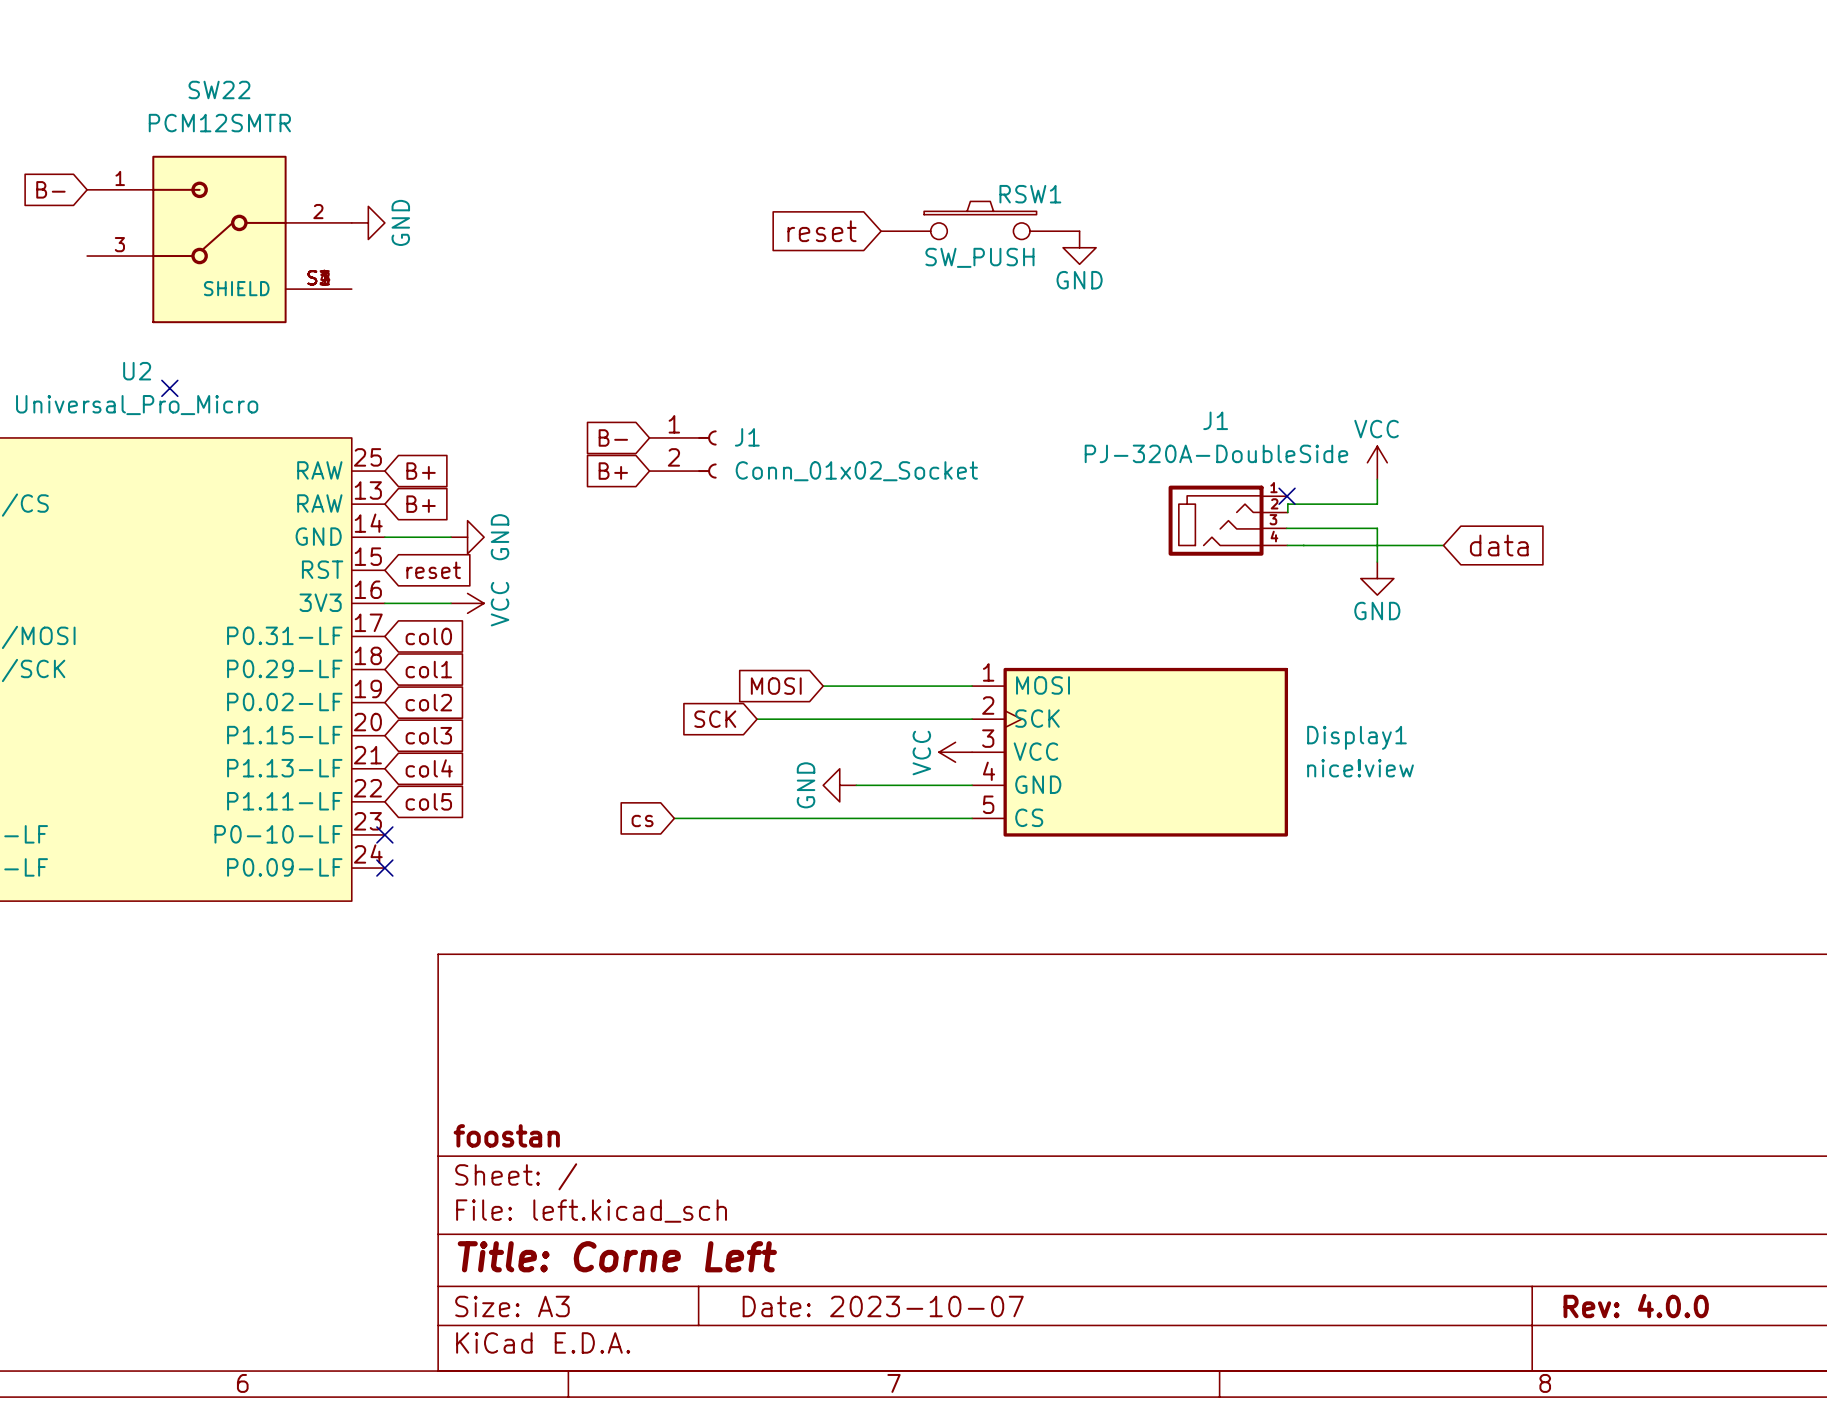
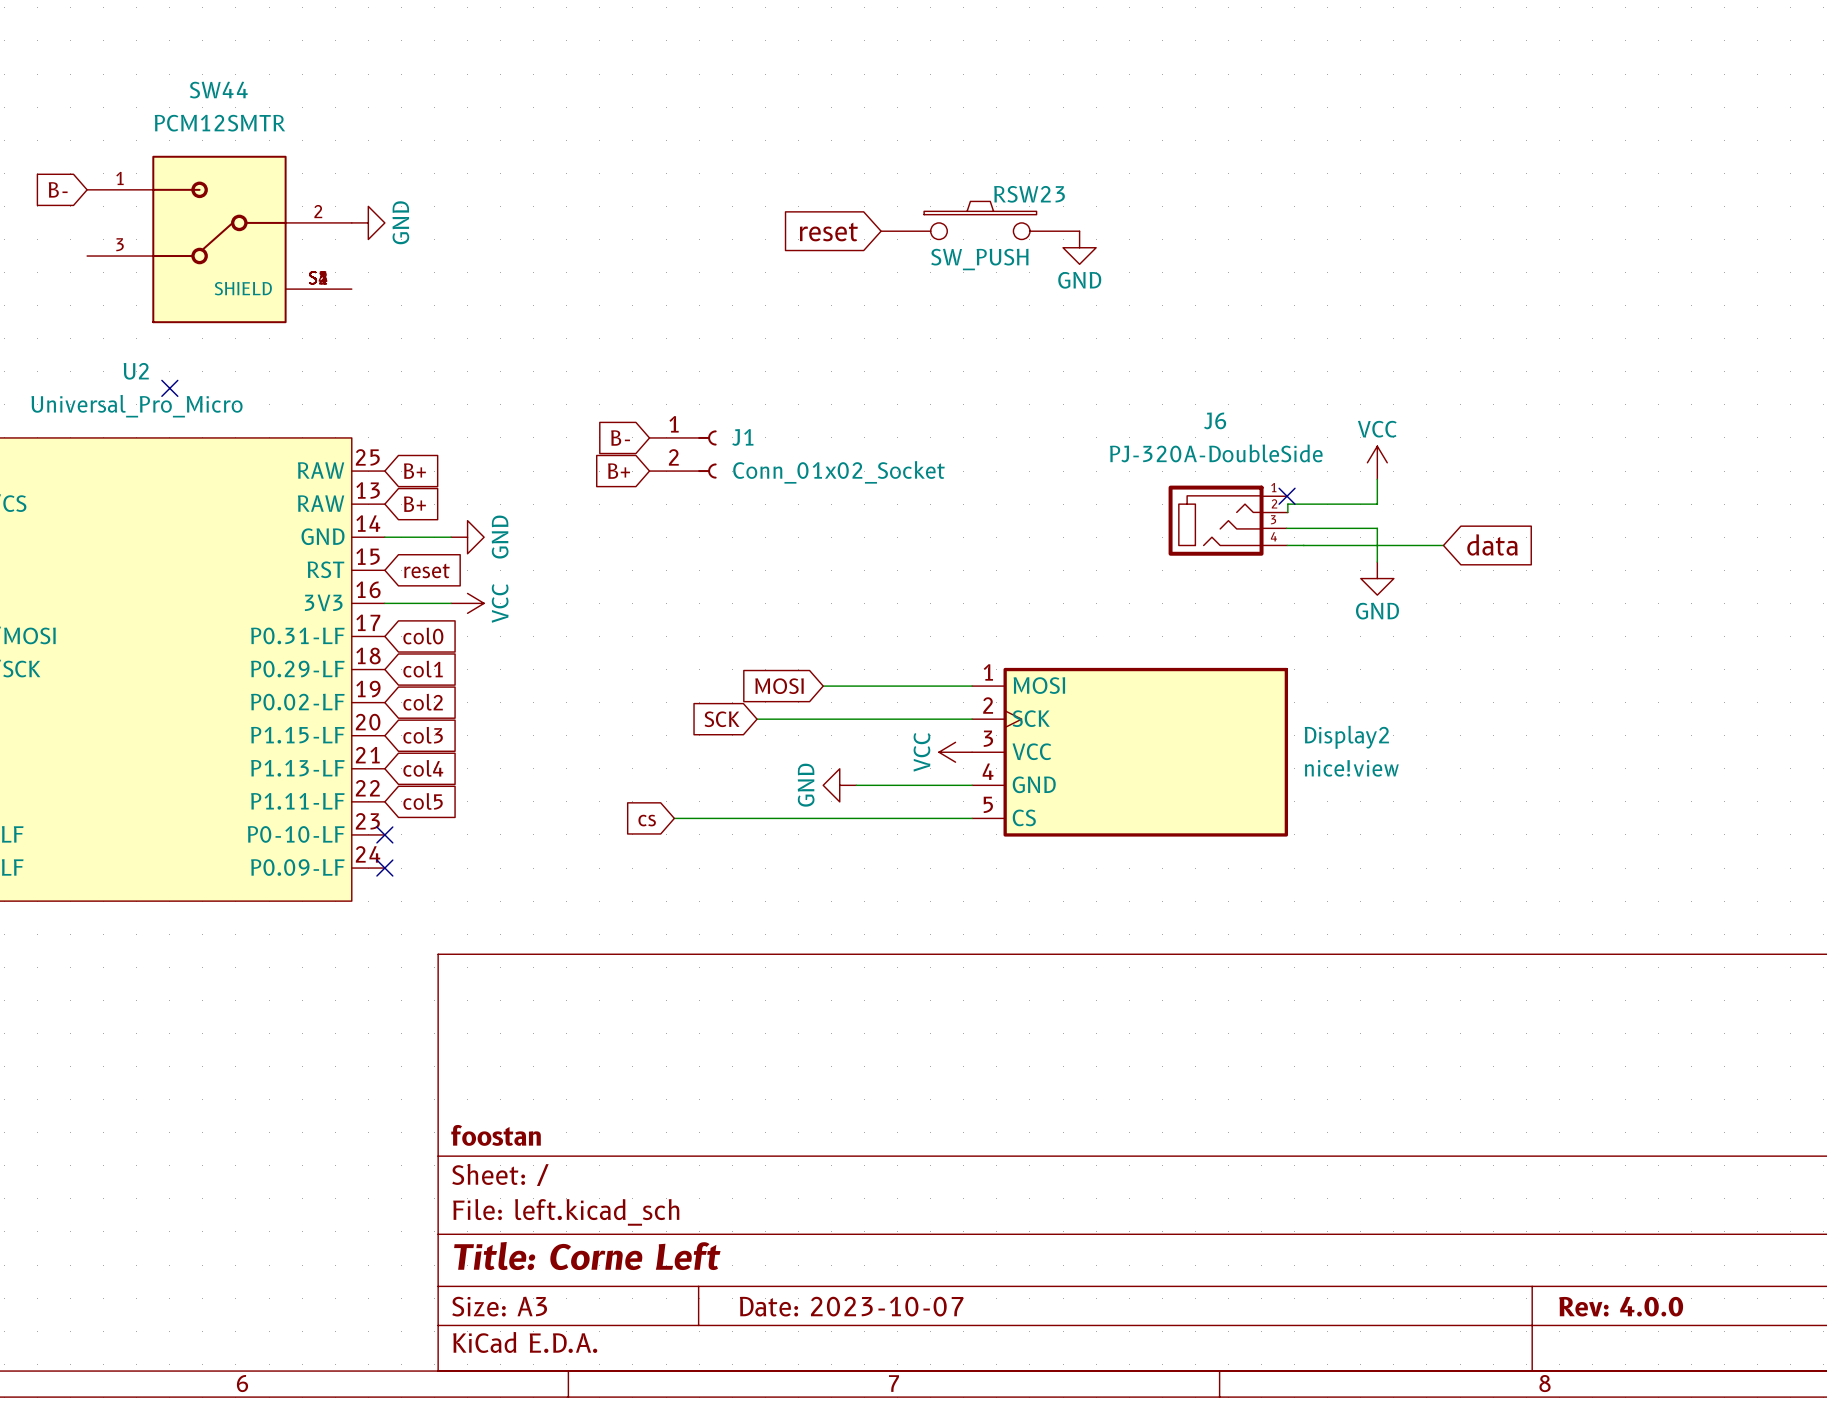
SW22 name: SW22 (219, 89) -> SW44 (218, 90)
RSW1 name: RSW1 (1030, 194) -> RSW23 (1029, 194)
J1 name: J1 (1215, 420) -> J6 (1215, 420)
Display1 name: Display1 (1356, 737) -> Display2 (1346, 737)

